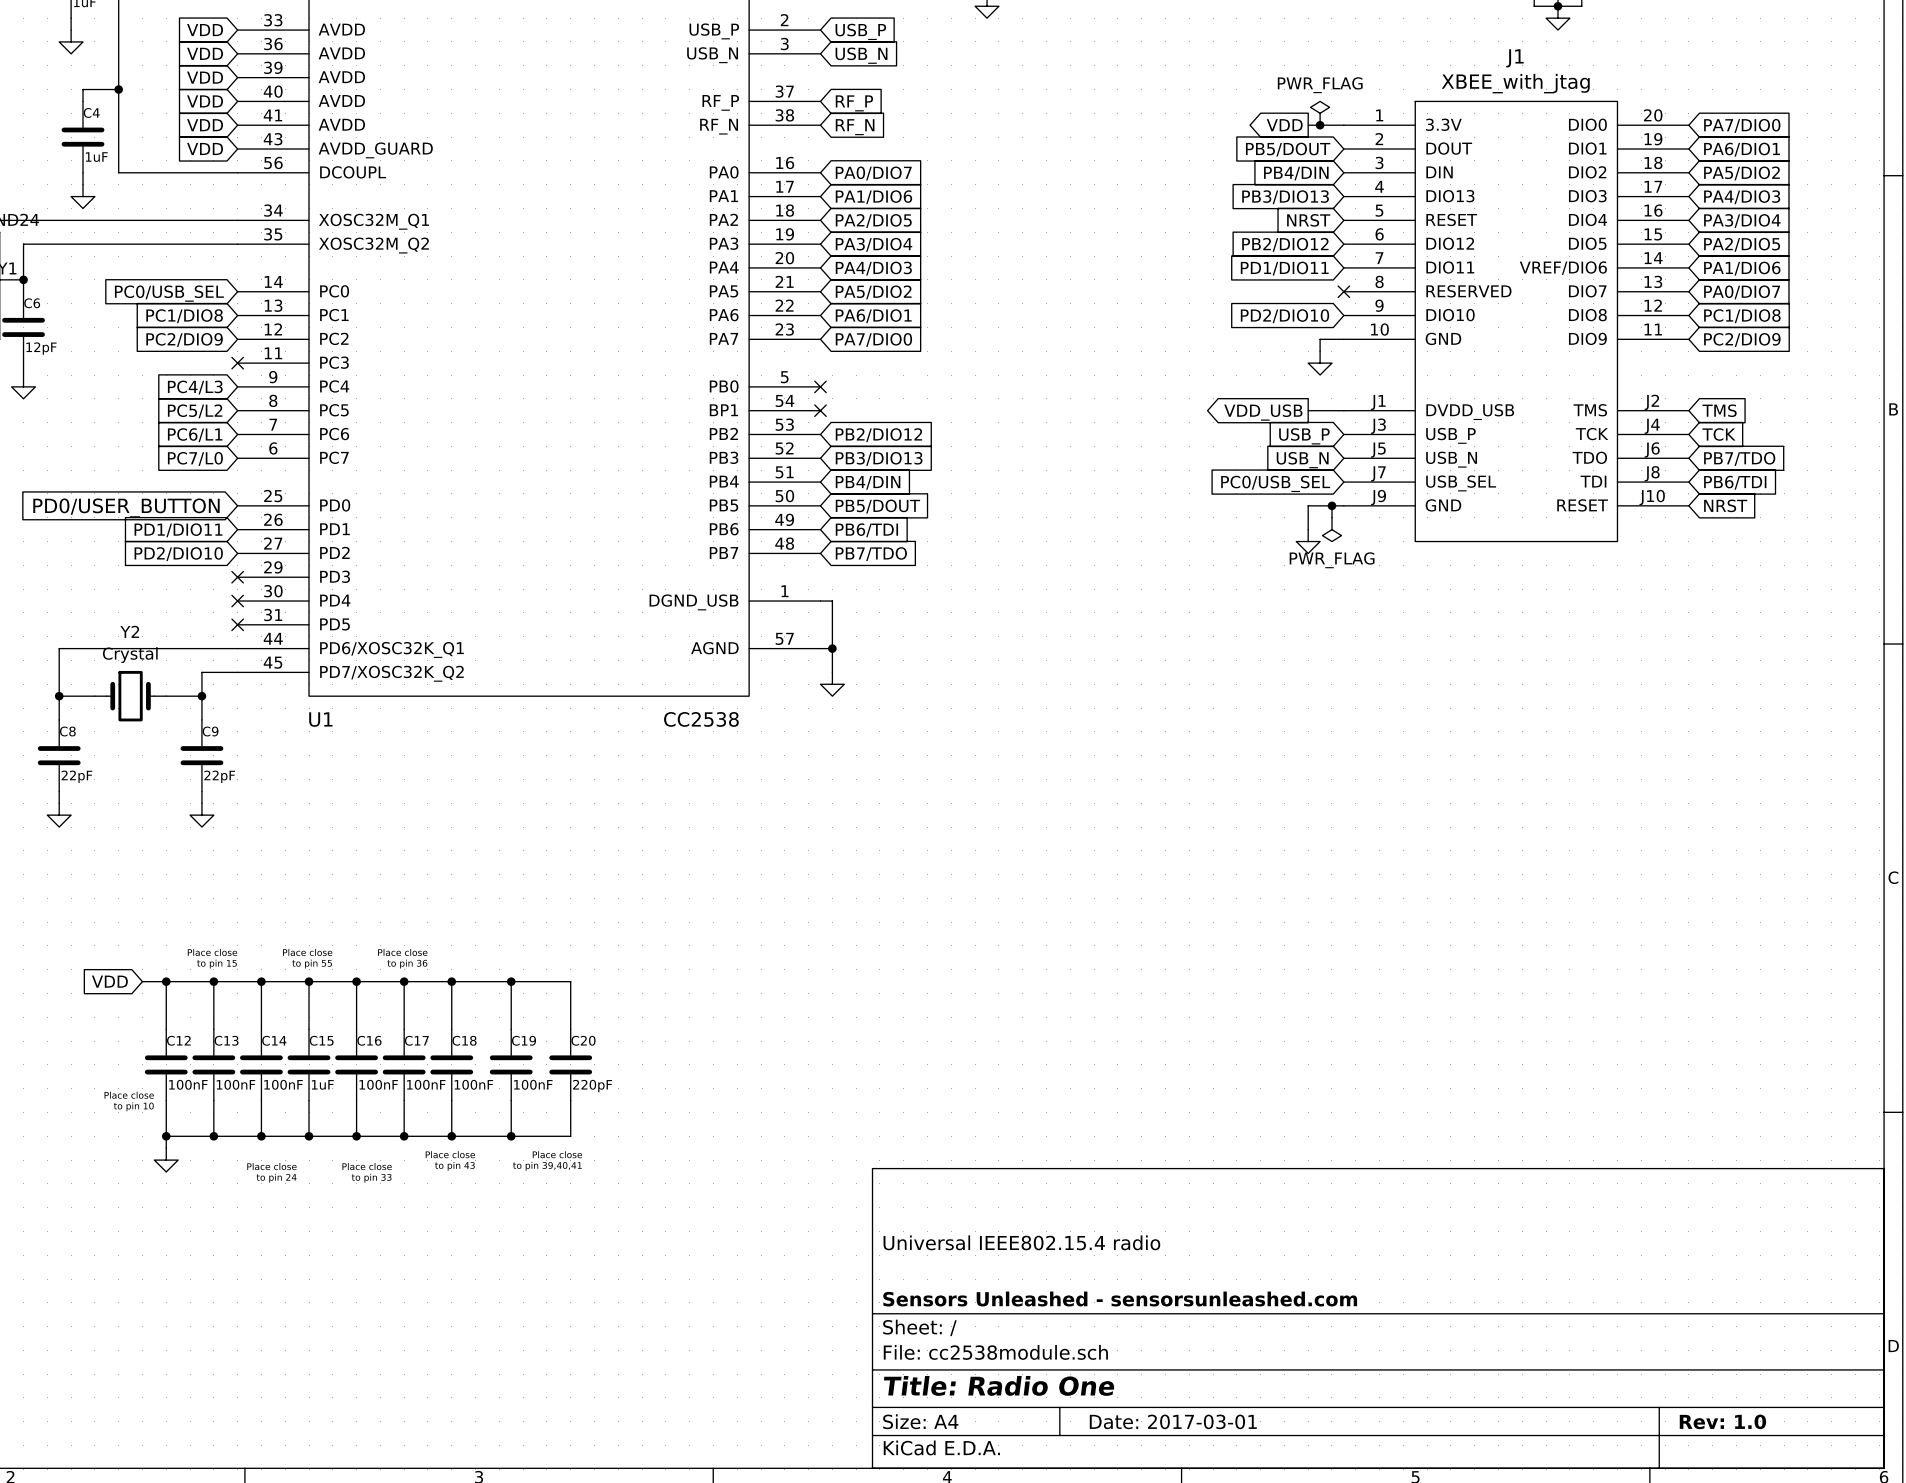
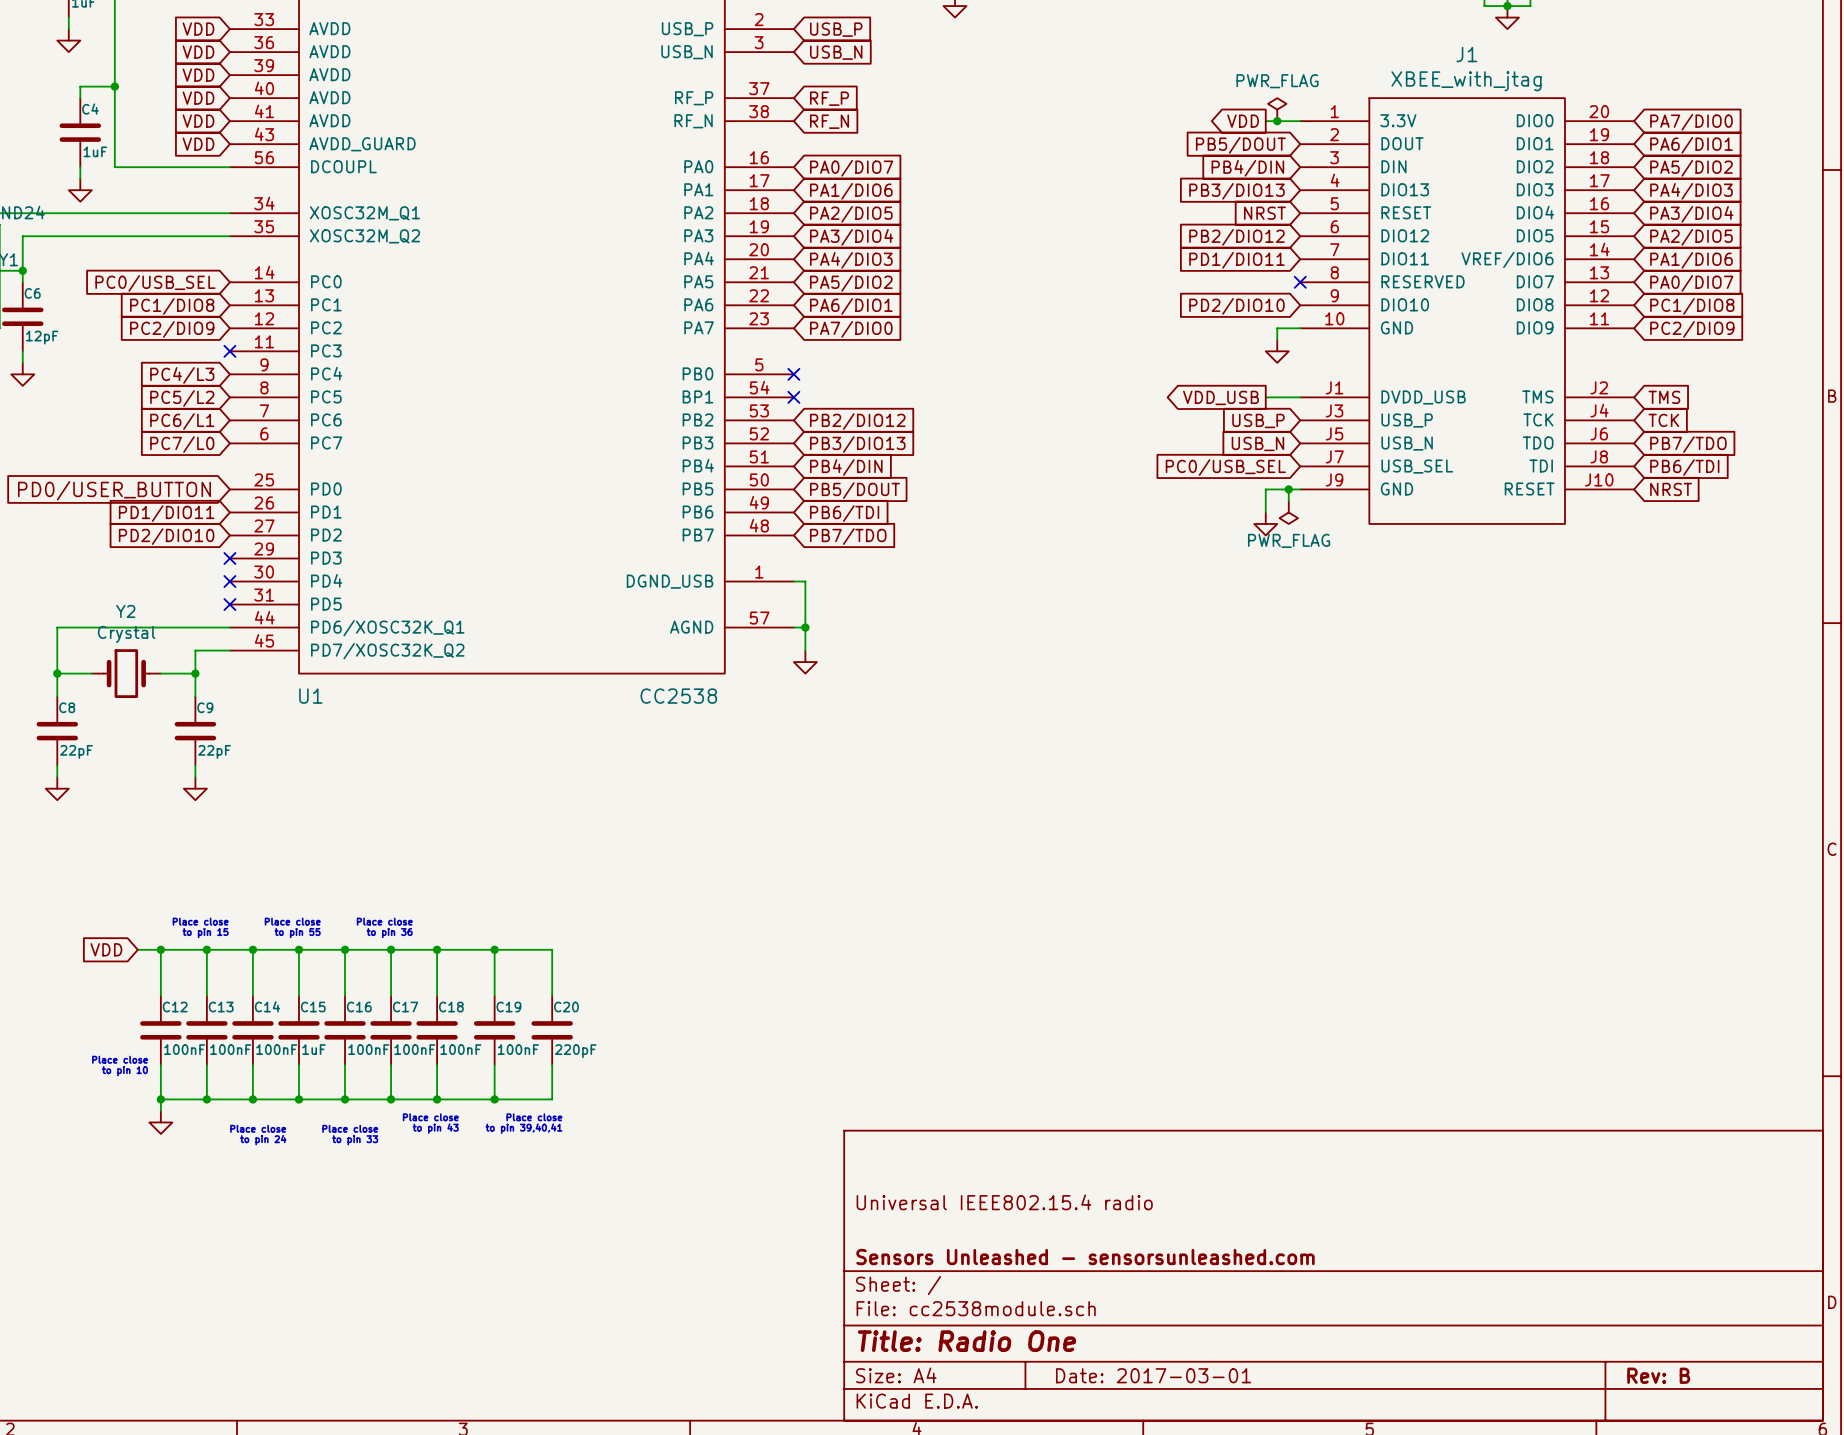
title block: Rev: 1.0 (1722, 1421) -> Rev: B (1658, 1375)

